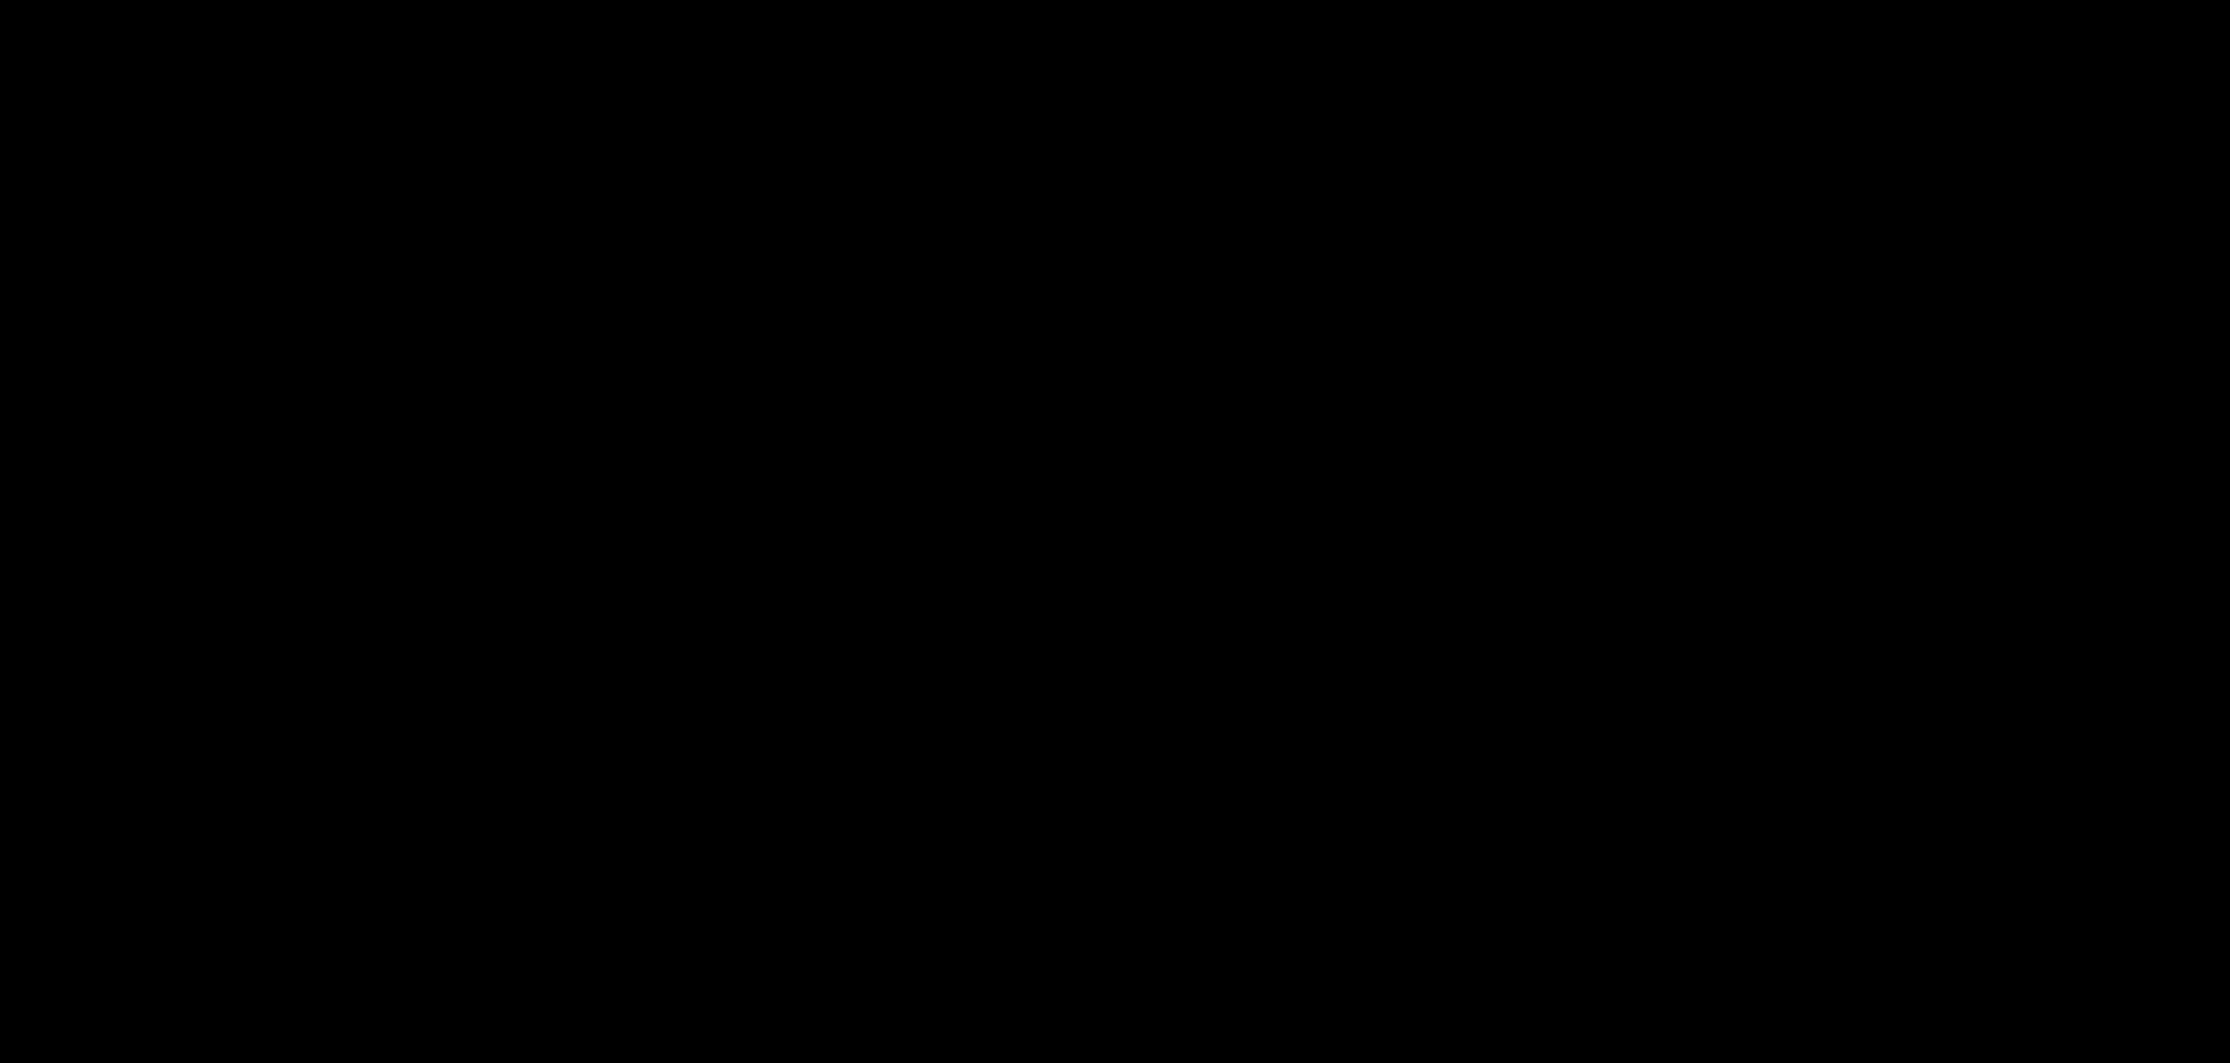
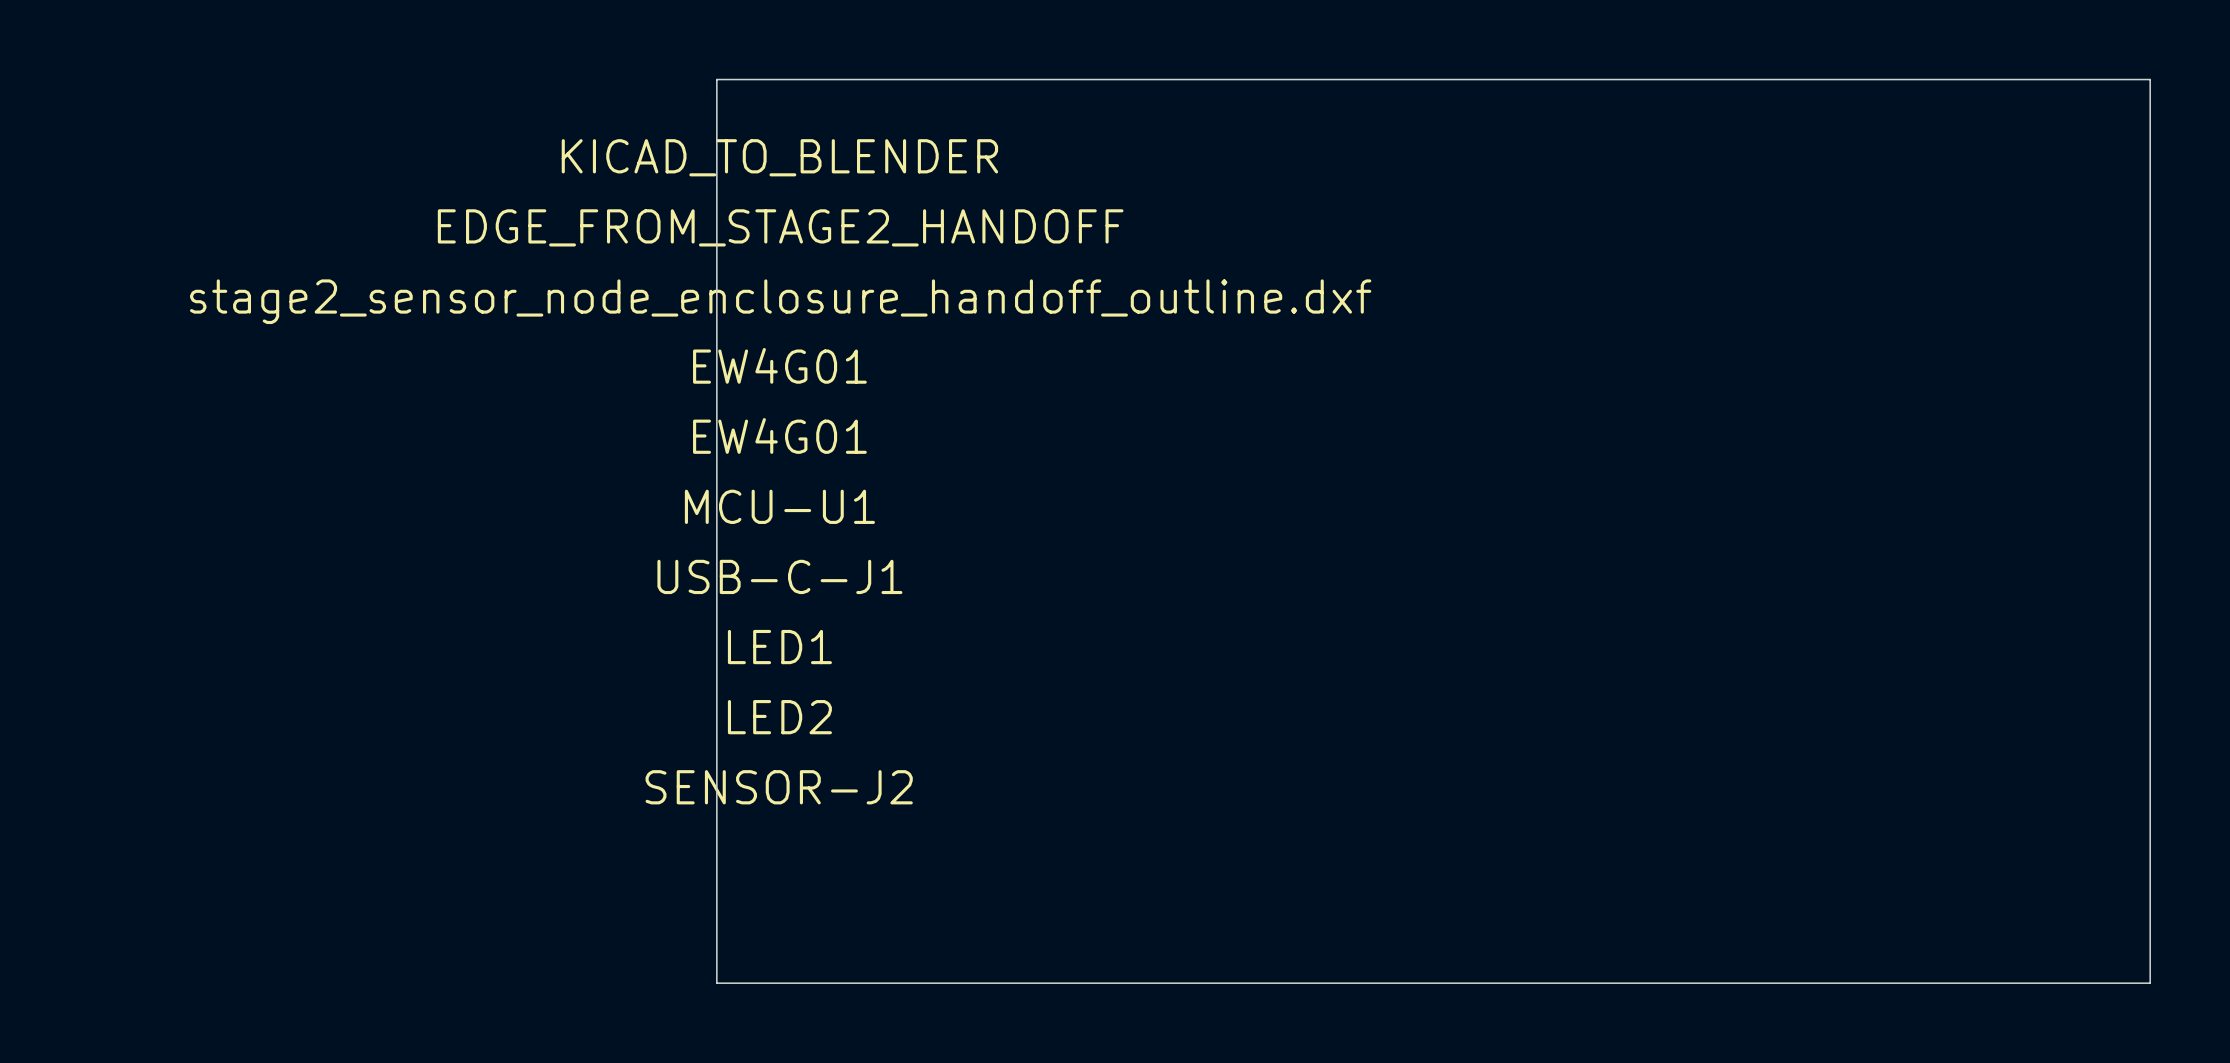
board edge: none -> (716, 79) (2150, 79) (2150, 983) (716, 983) (716, 79)
text: none -> KICAD_TO_BLENDER (779, 157)
text: none -> EDGE_FROM_STAGE2_HANDOFF (780, 227)
text: none -> stage2_sensor_node_enclosure_handoff_outline.dxf (780, 301)
text: none -> EW4G01 (779, 365)
text: none -> EW4G01 (779, 435)
text: none -> MCU-U1 (779, 506)
text: none -> USB-C-J1 (779, 576)
text: none -> LED1 (779, 647)
text: none -> LED2 (779, 717)
text: none -> SENSOR-J2 (779, 787)

